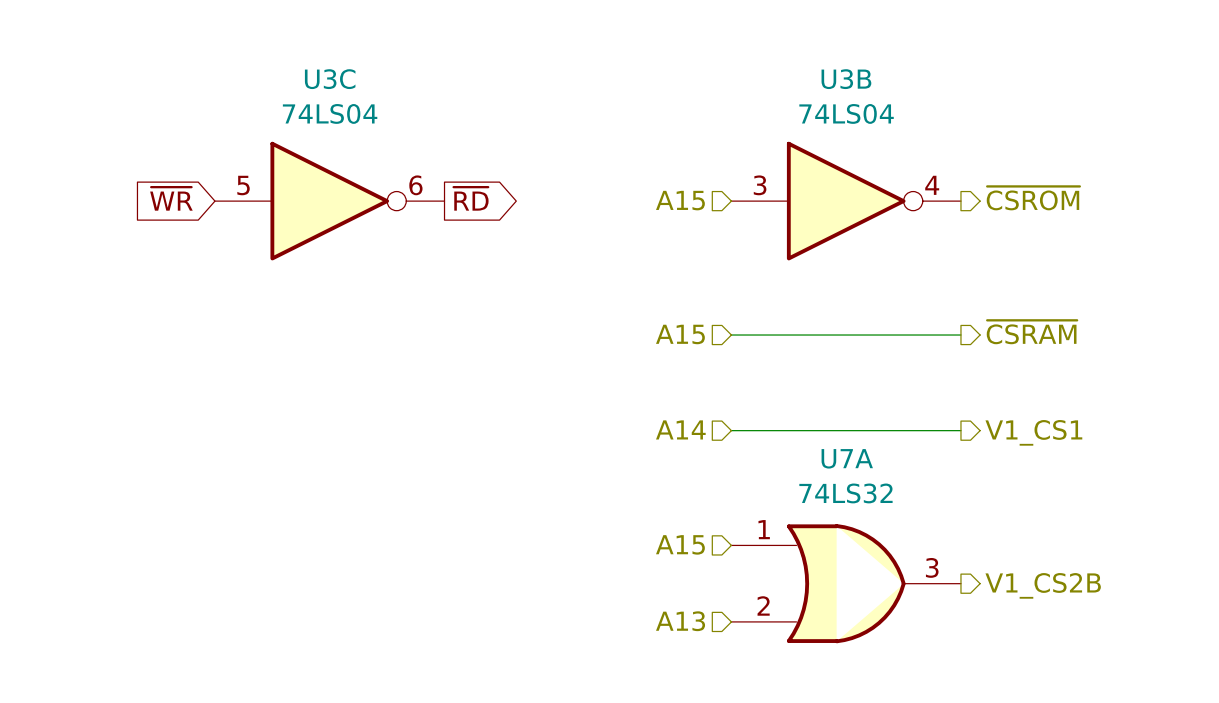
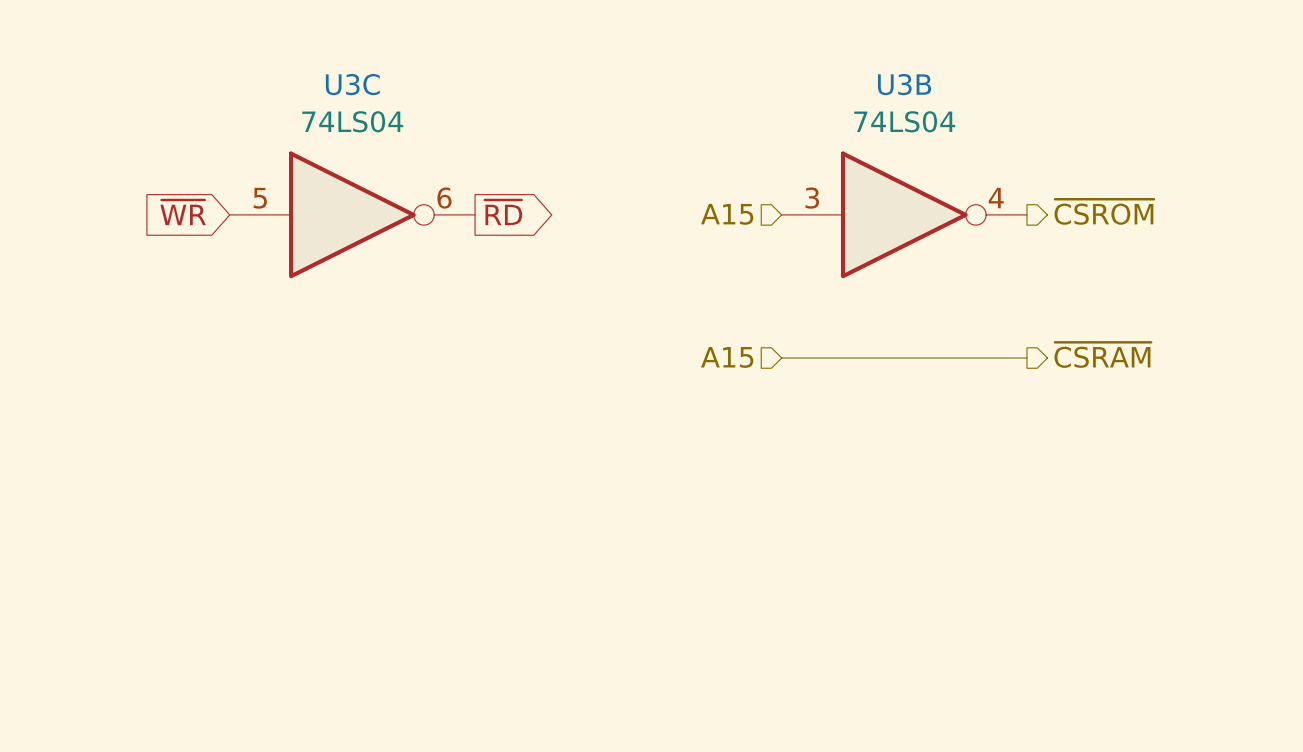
hierarchical label: A14 (680, 429) -> none
wire: (731, 430) (960, 430) -> none
hierarchical label: V1_CS1 (1033, 432) -> none
hierarchical label: A15 (680, 544) -> none
U7A: 74LS32 (846, 583) -> none
hierarchical label: V1_CS2B (1043, 585) -> none
hierarchical label: A13 (680, 621) -> none

